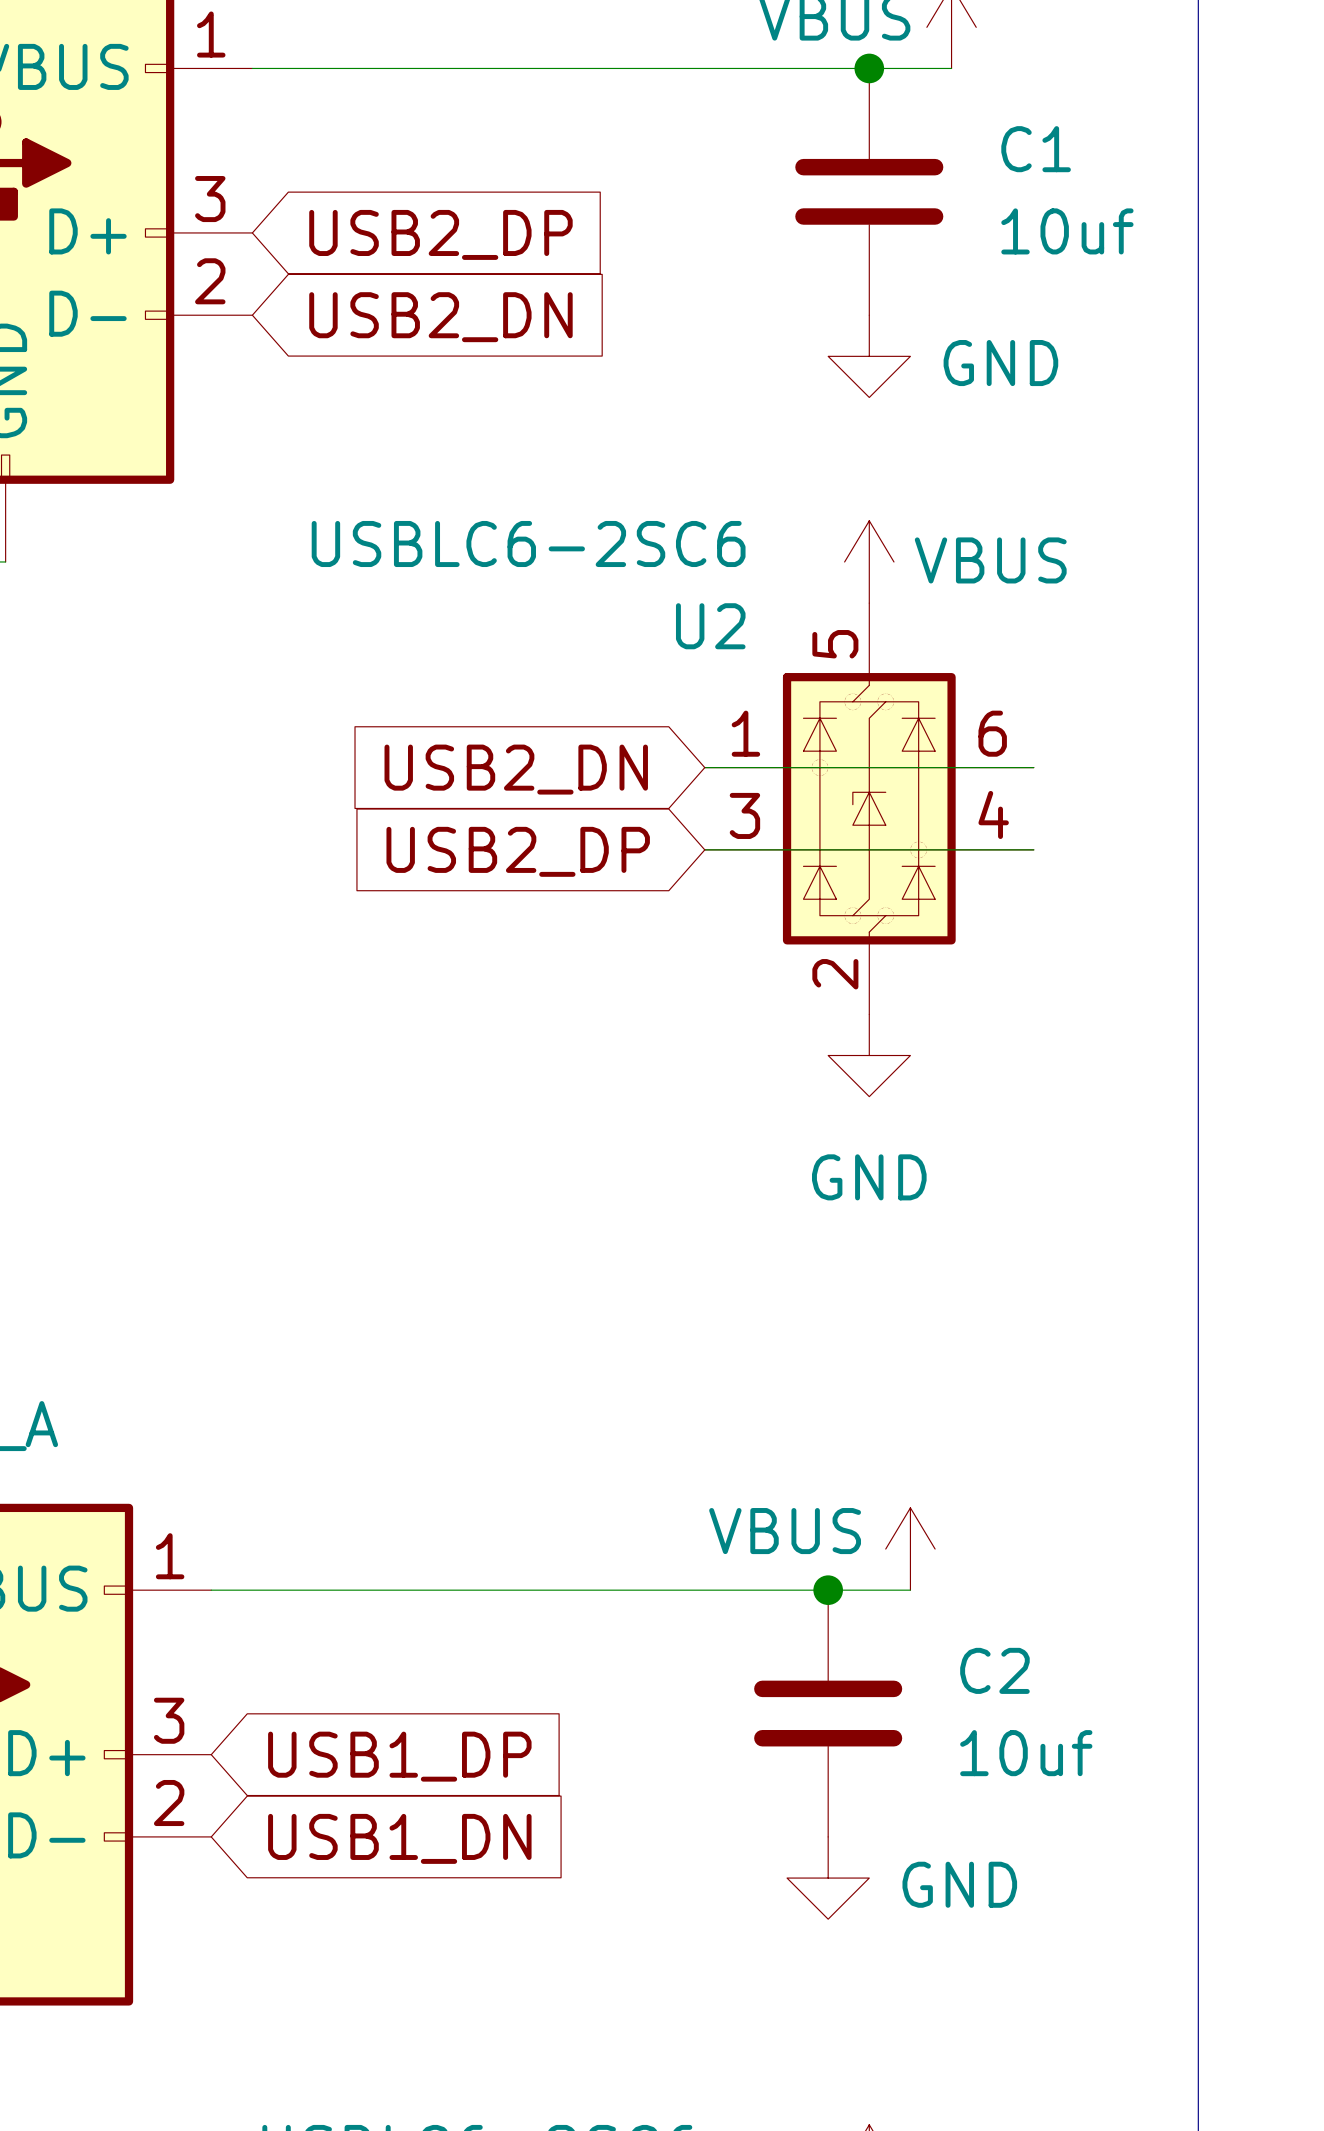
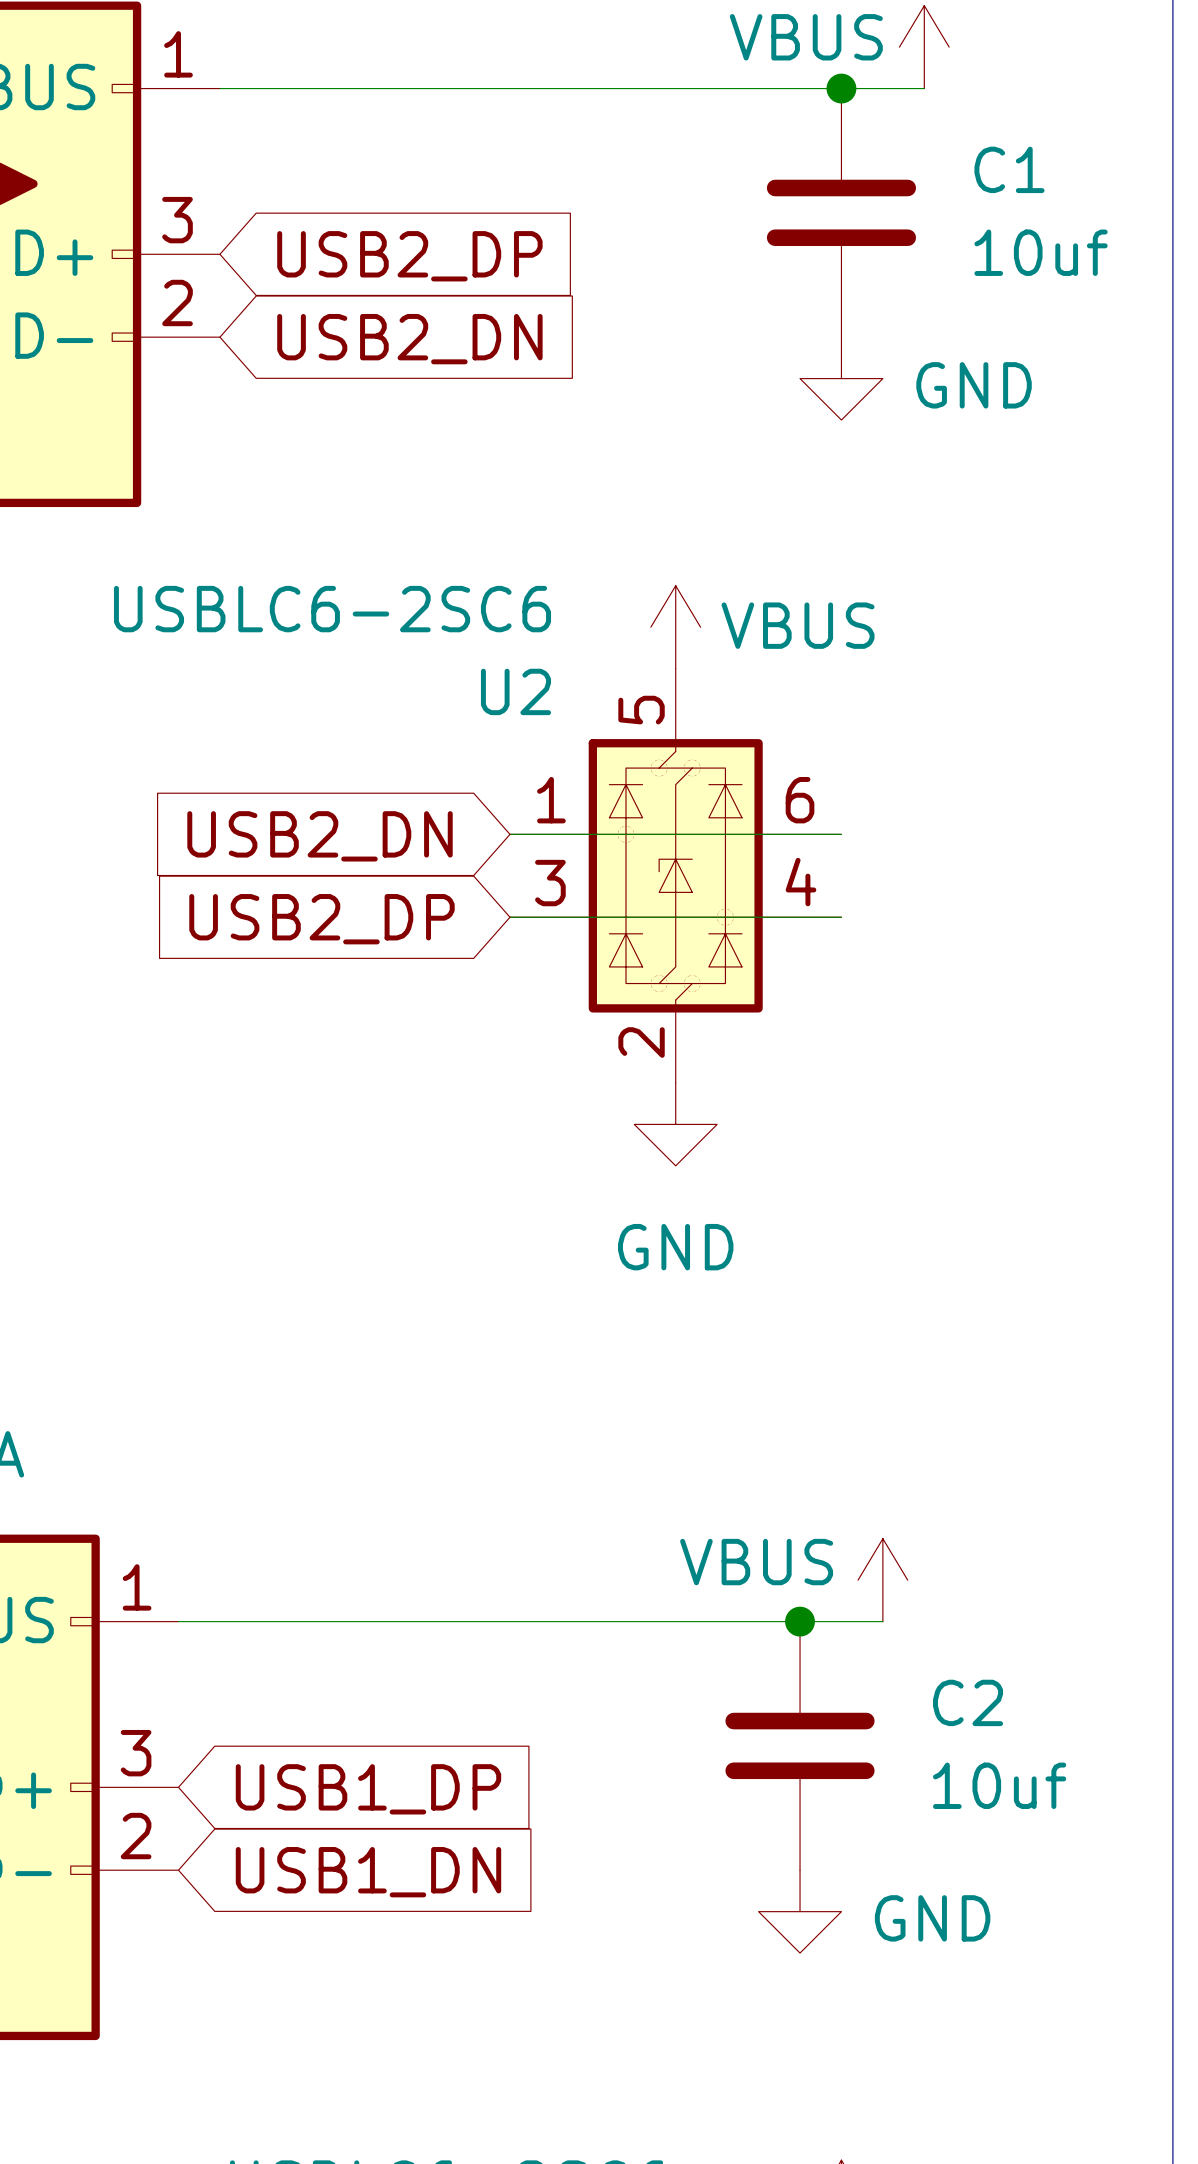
power symbol position: VBUS (869, 561) -> VBUS (675, 627)
global label position: USB2_DN (516, 769) -> USB2_DN (320, 836)
U2 position: (869, 808) -> (675, 875)
global label position: USB2_DP (518, 851) -> USB2_DP (321, 919)
power symbol position: GND (869, 1055) -> GND (675, 1124)

